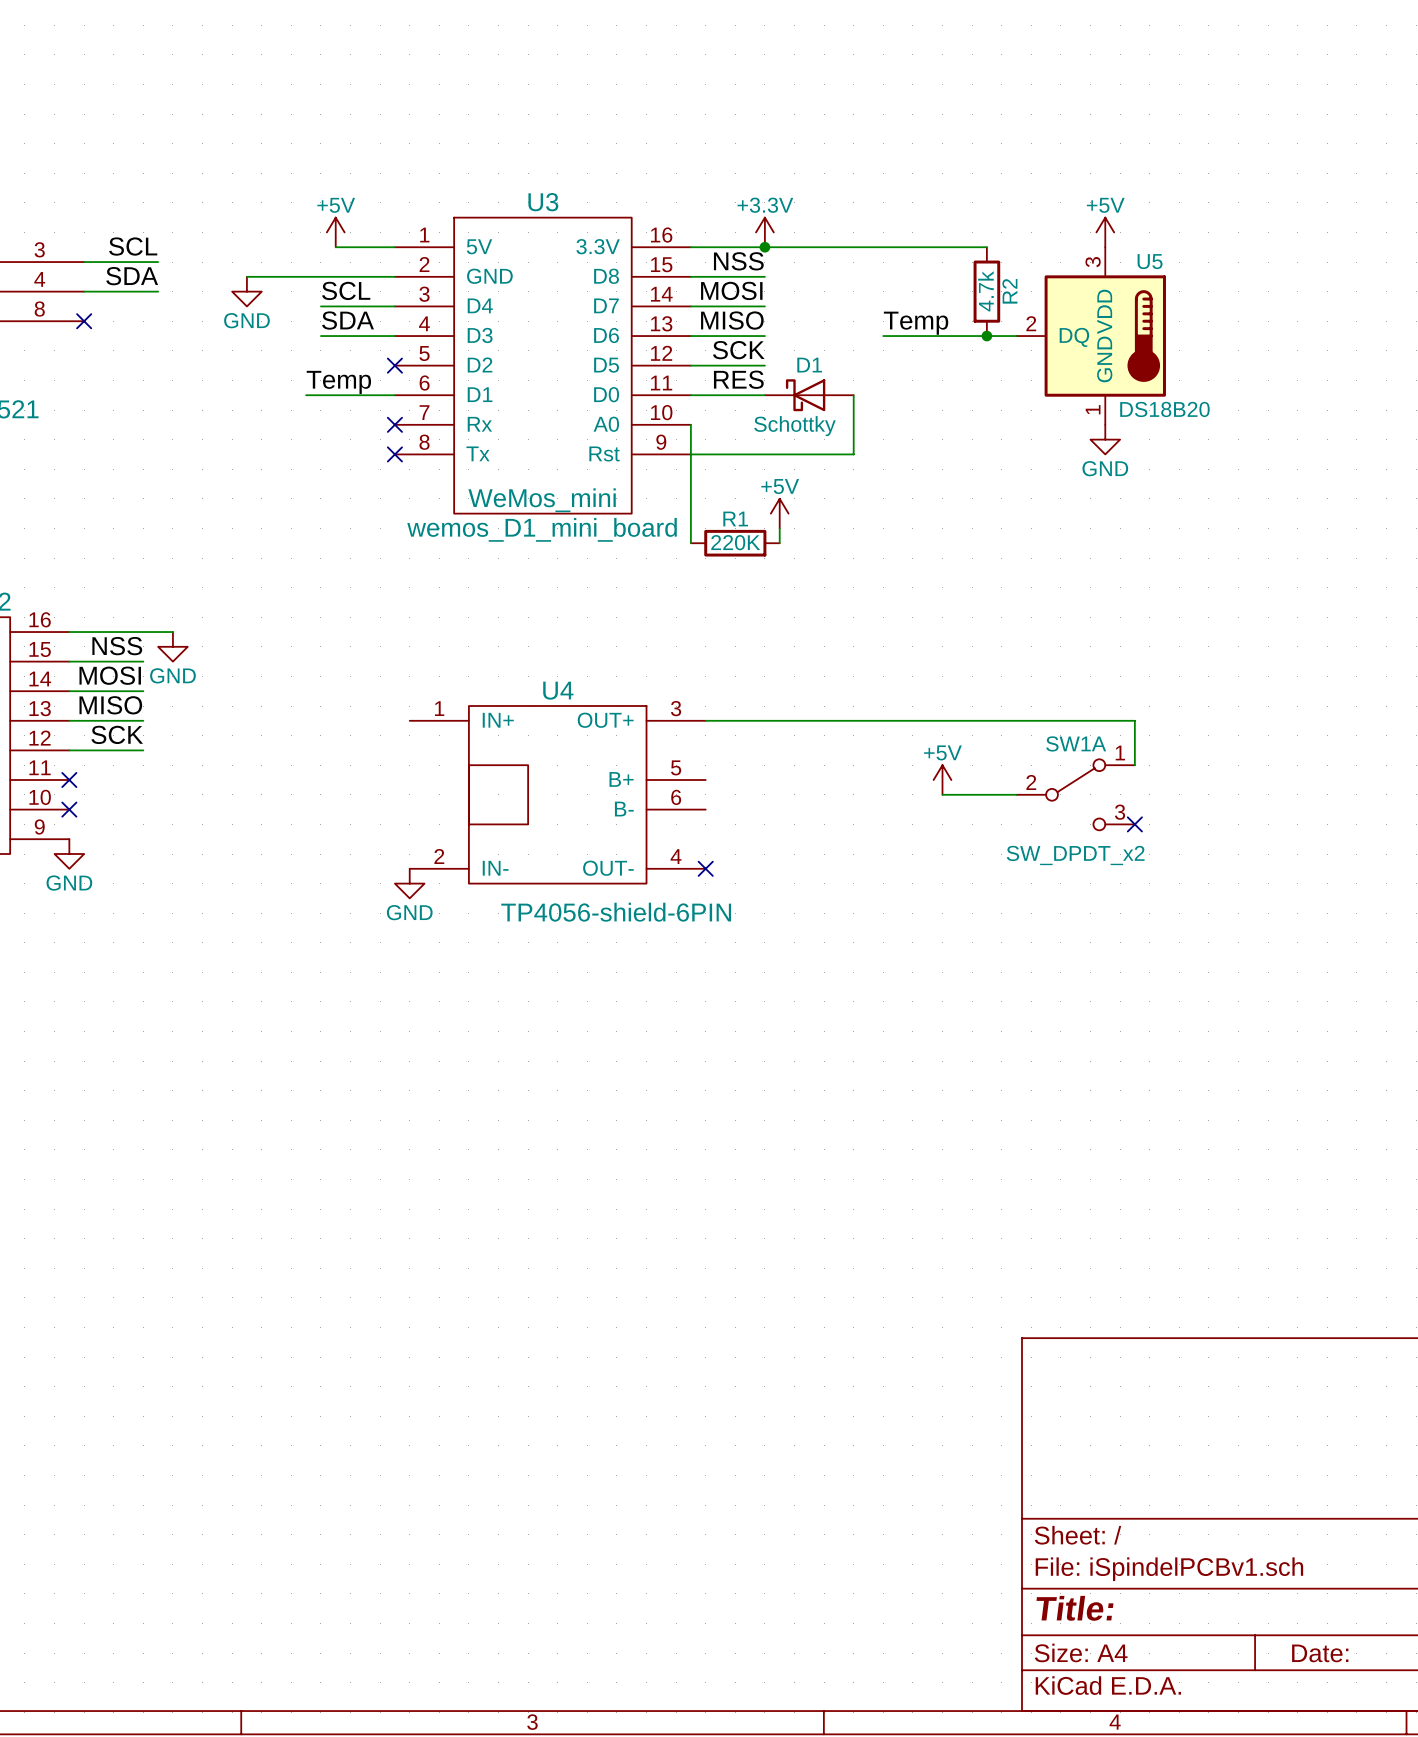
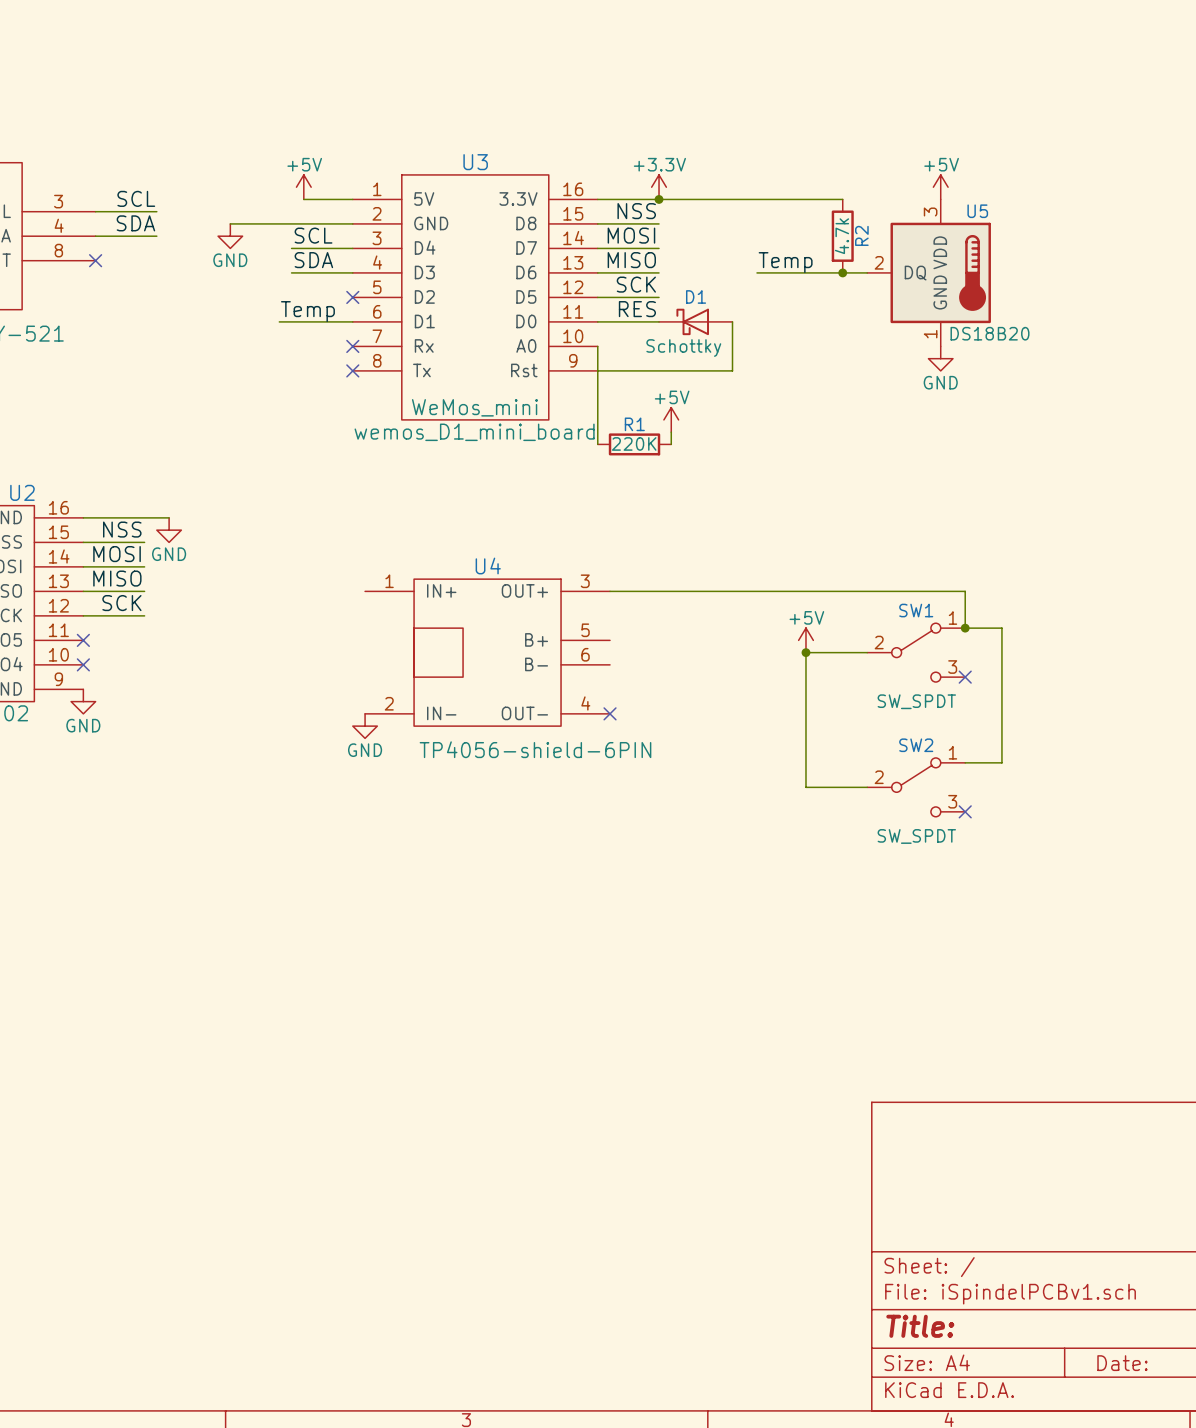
SW1A name: SW1A (1076, 743) -> SW1 (916, 610)
wire: none -> (965, 628) (1001, 628) (1001, 762) (965, 762)
junction: none -> (965, 628)
wire: none -> (805, 652) (805, 787) (867, 787)
junction: none -> (805, 652)
SW1A value: SW_DPDT_x2 (1075, 855) -> SW_SPDT (916, 701)
SW2: none -> SW_SPDT (916, 787)
no-connect mark: none -> (965, 811)

